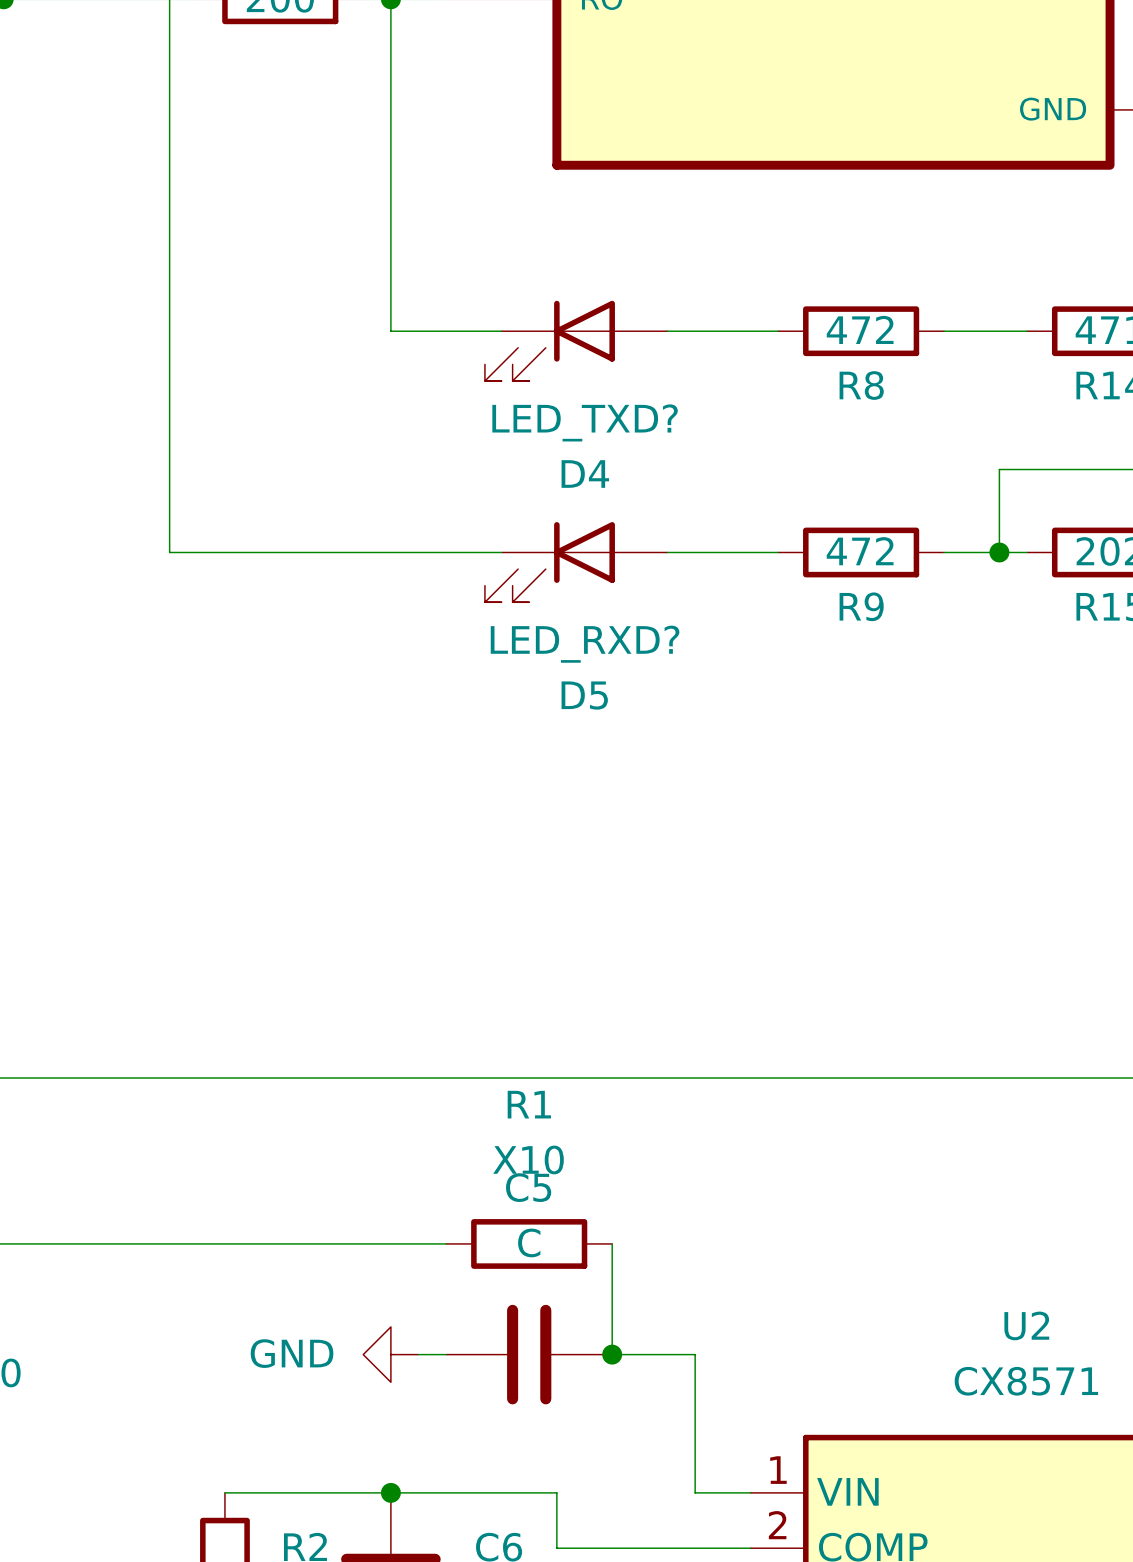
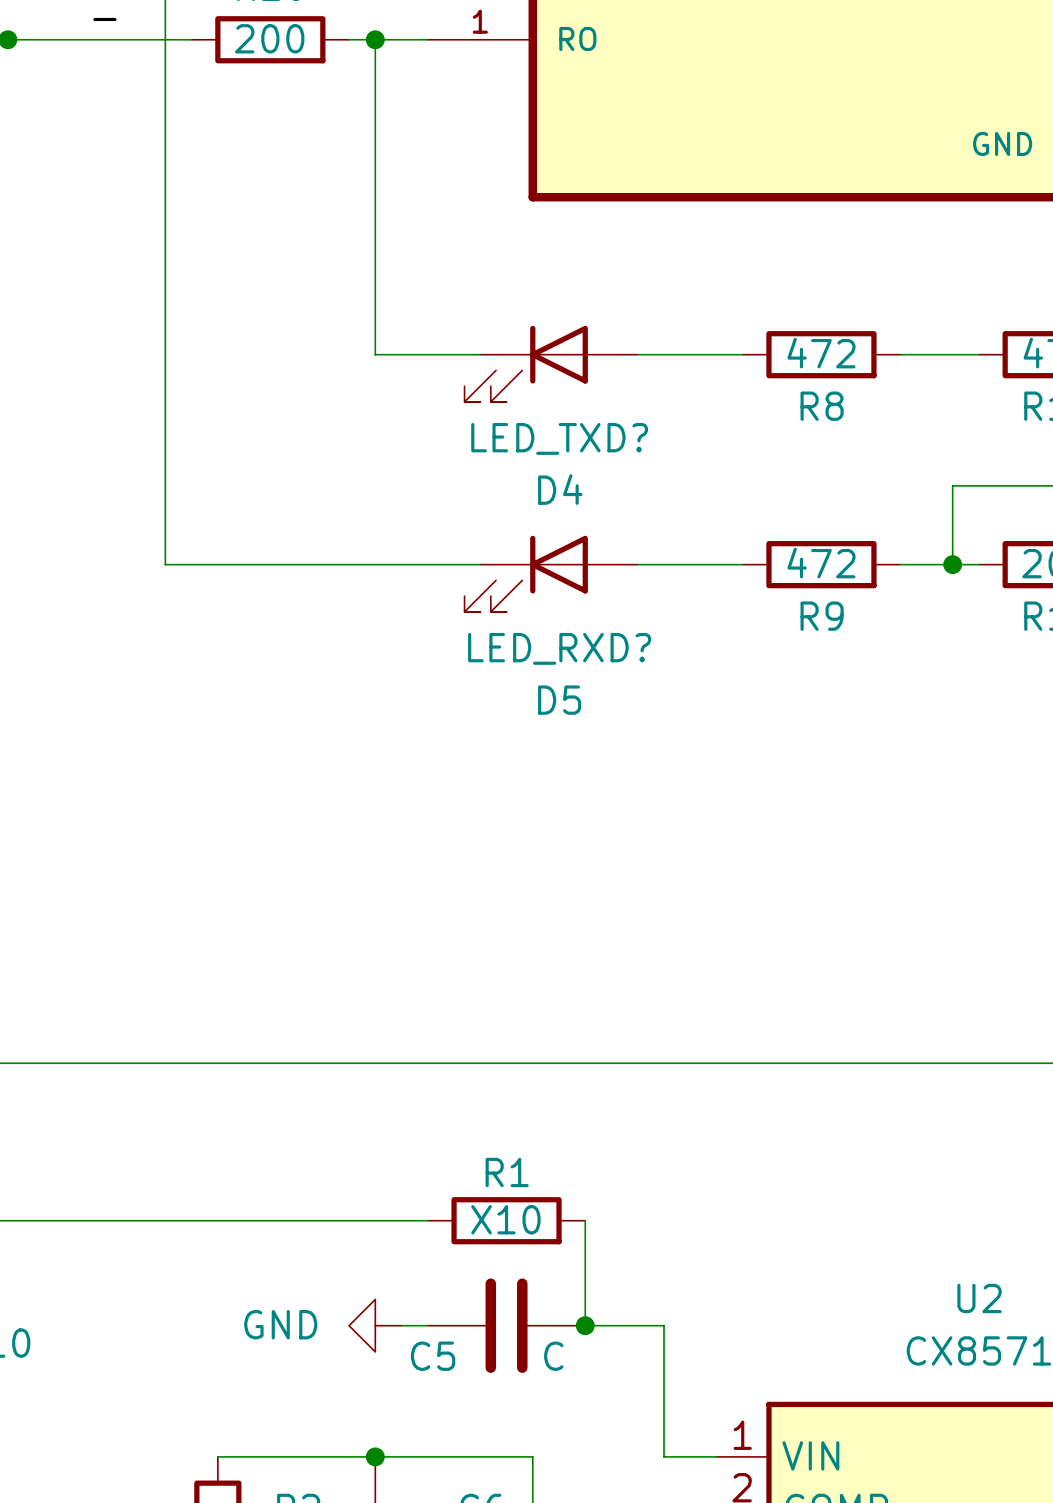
R1 name position: R1 (529, 1104) -> R1 (507, 1172)
R1 value position: X10 (528, 1159) -> X10 (505, 1219)
C5 name position: C5 (528, 1187) -> C5 (433, 1356)
C5 value position: C (529, 1242) -> C (553, 1356)

